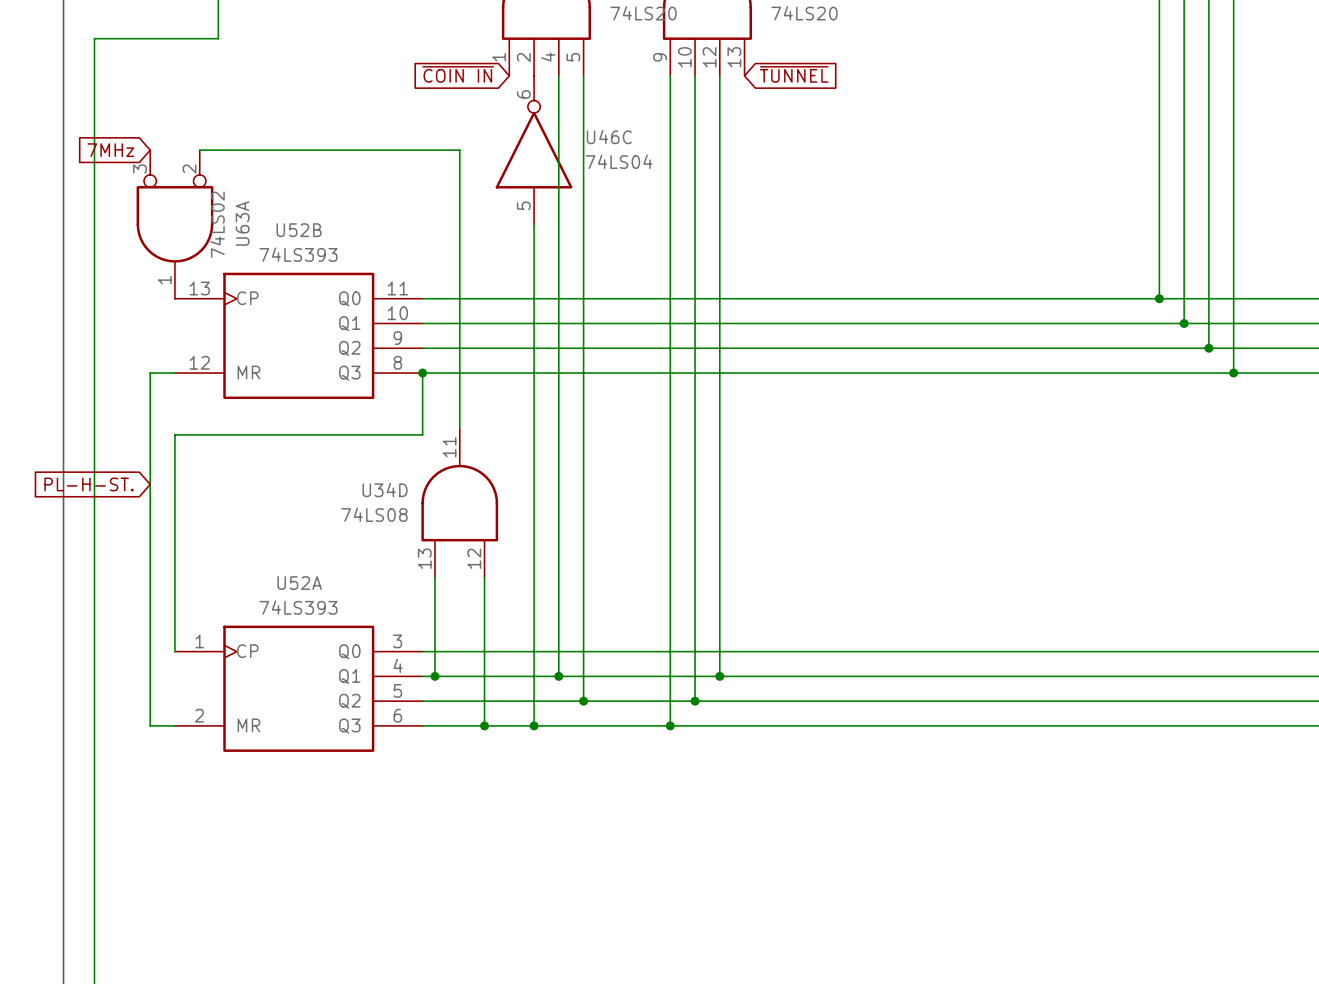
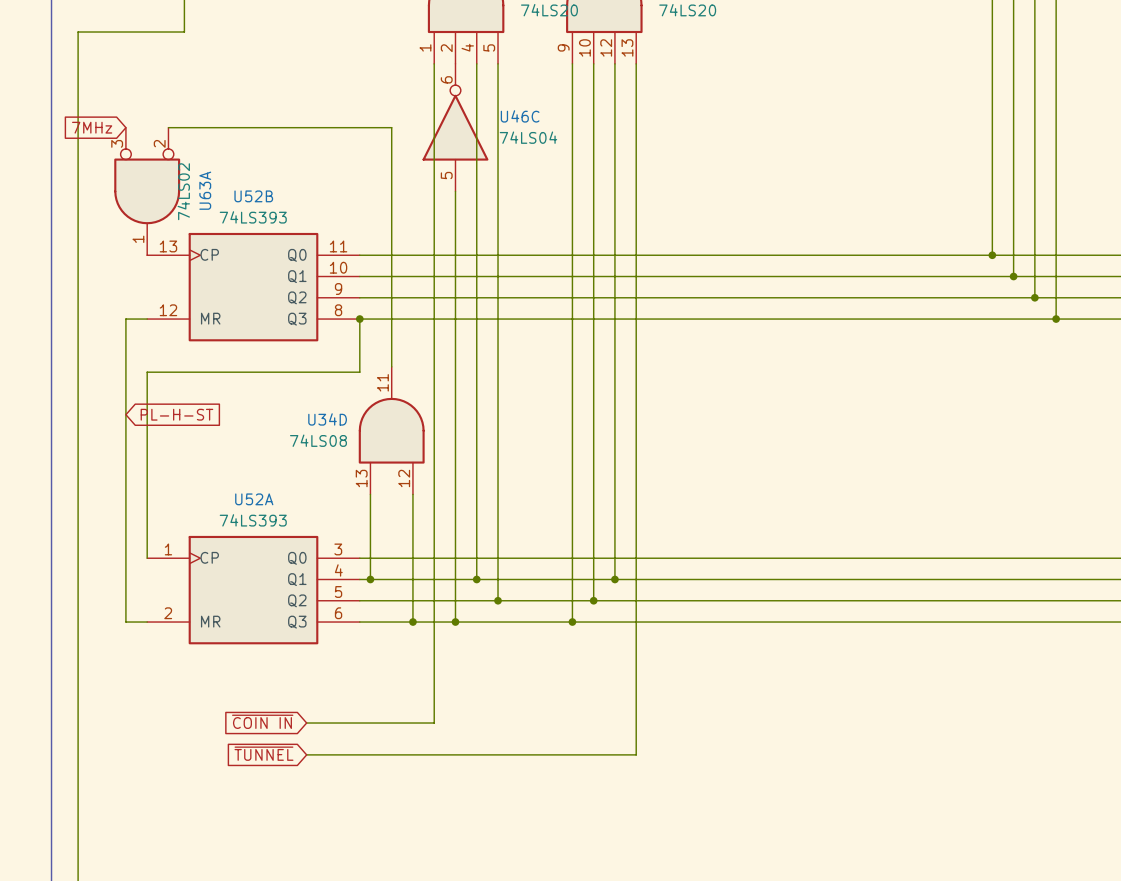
global label: ~{COIN IN} (458, 74) -> none
global label: ~{TUNNEL} (794, 74) -> none
wire: none -> (434, 63) (434, 723) (306, 723)
wire: none -> (636, 63) (636, 754) (306, 754)
global label: PL-H-ST. (89, 484) -> PL-H-ST (176, 414)
global label: none -> ~{COIN IN} (262, 721)
global label: none -> ~{TUNNEL} (263, 753)

